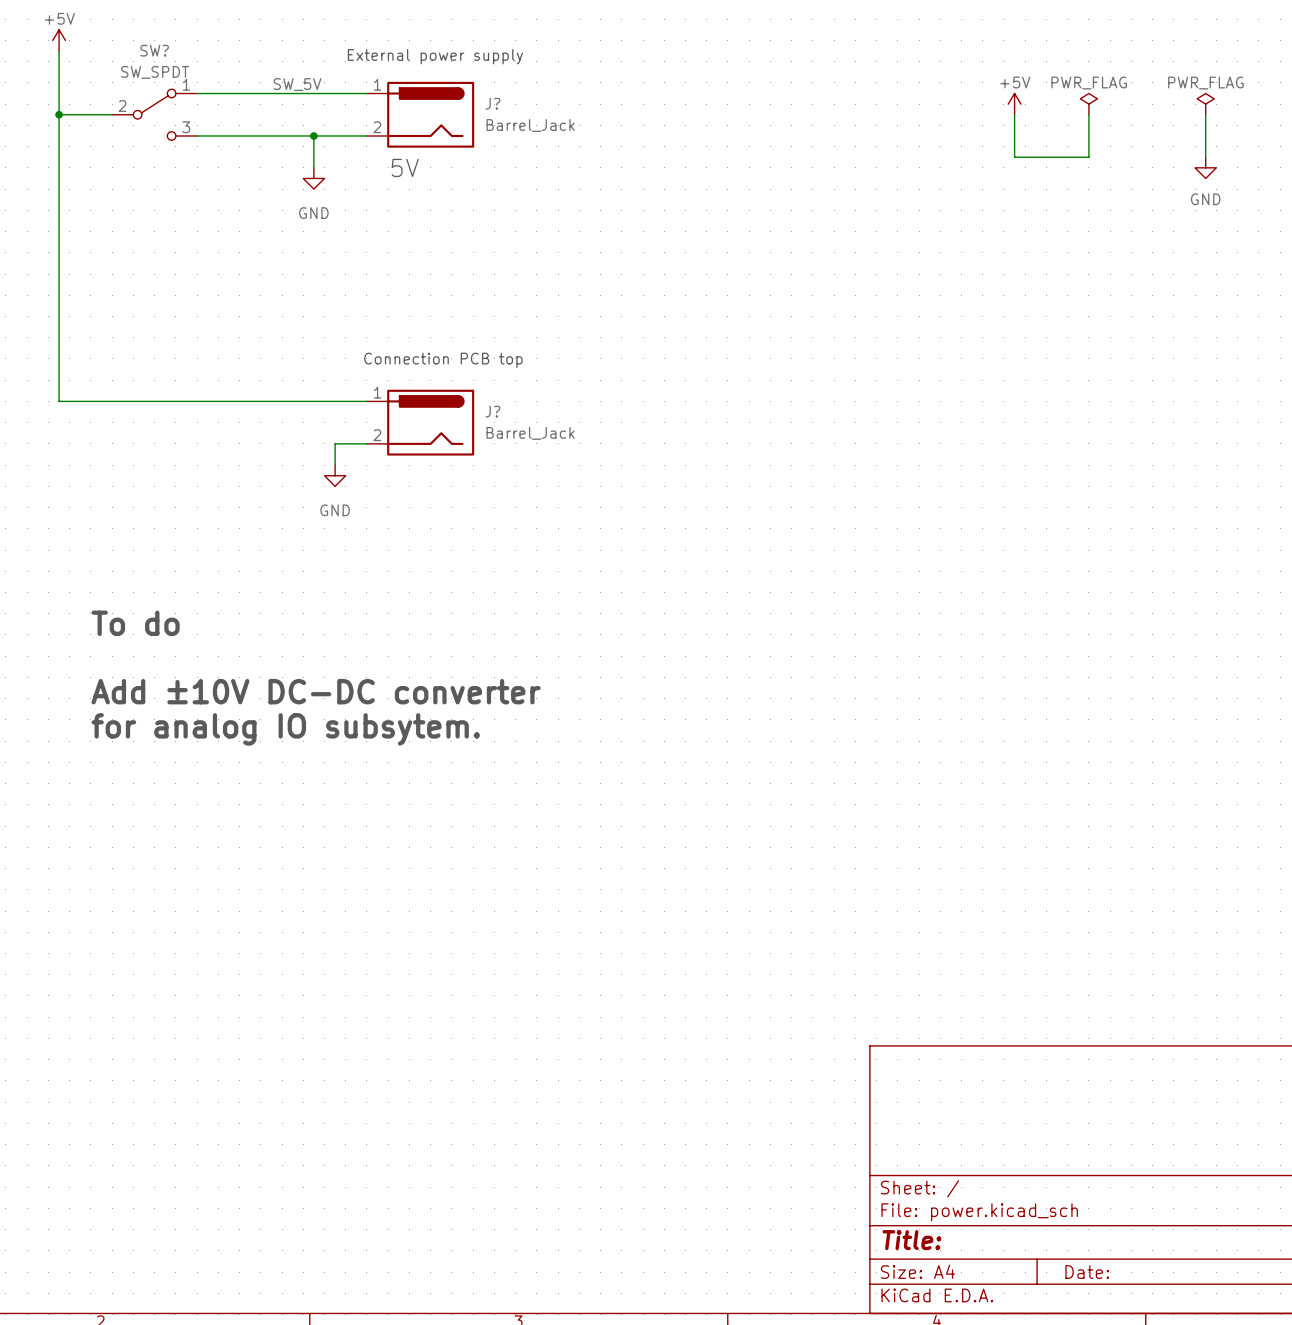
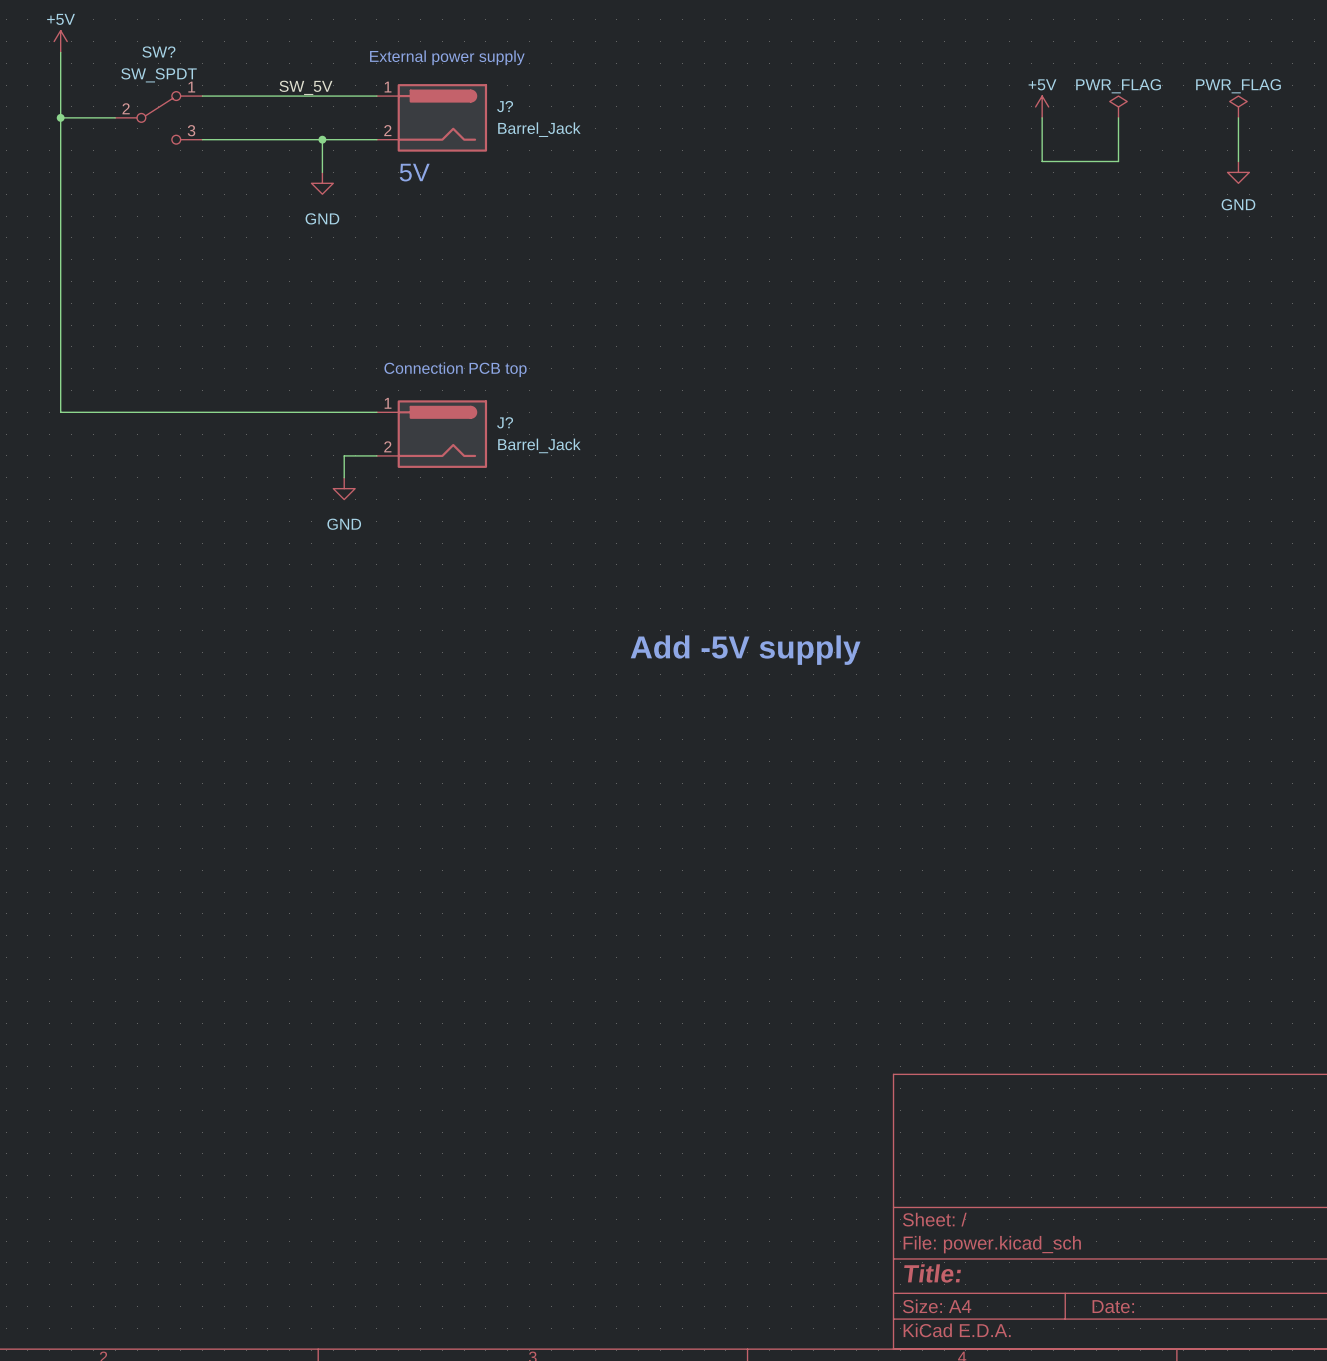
text: To do (135, 623) -> none
text: none -> Add -5V supply (745, 650)
text: Add ±10V DC-DC converter (316, 691) -> none
text: for analog IO subsytem. (285, 729) -> none

